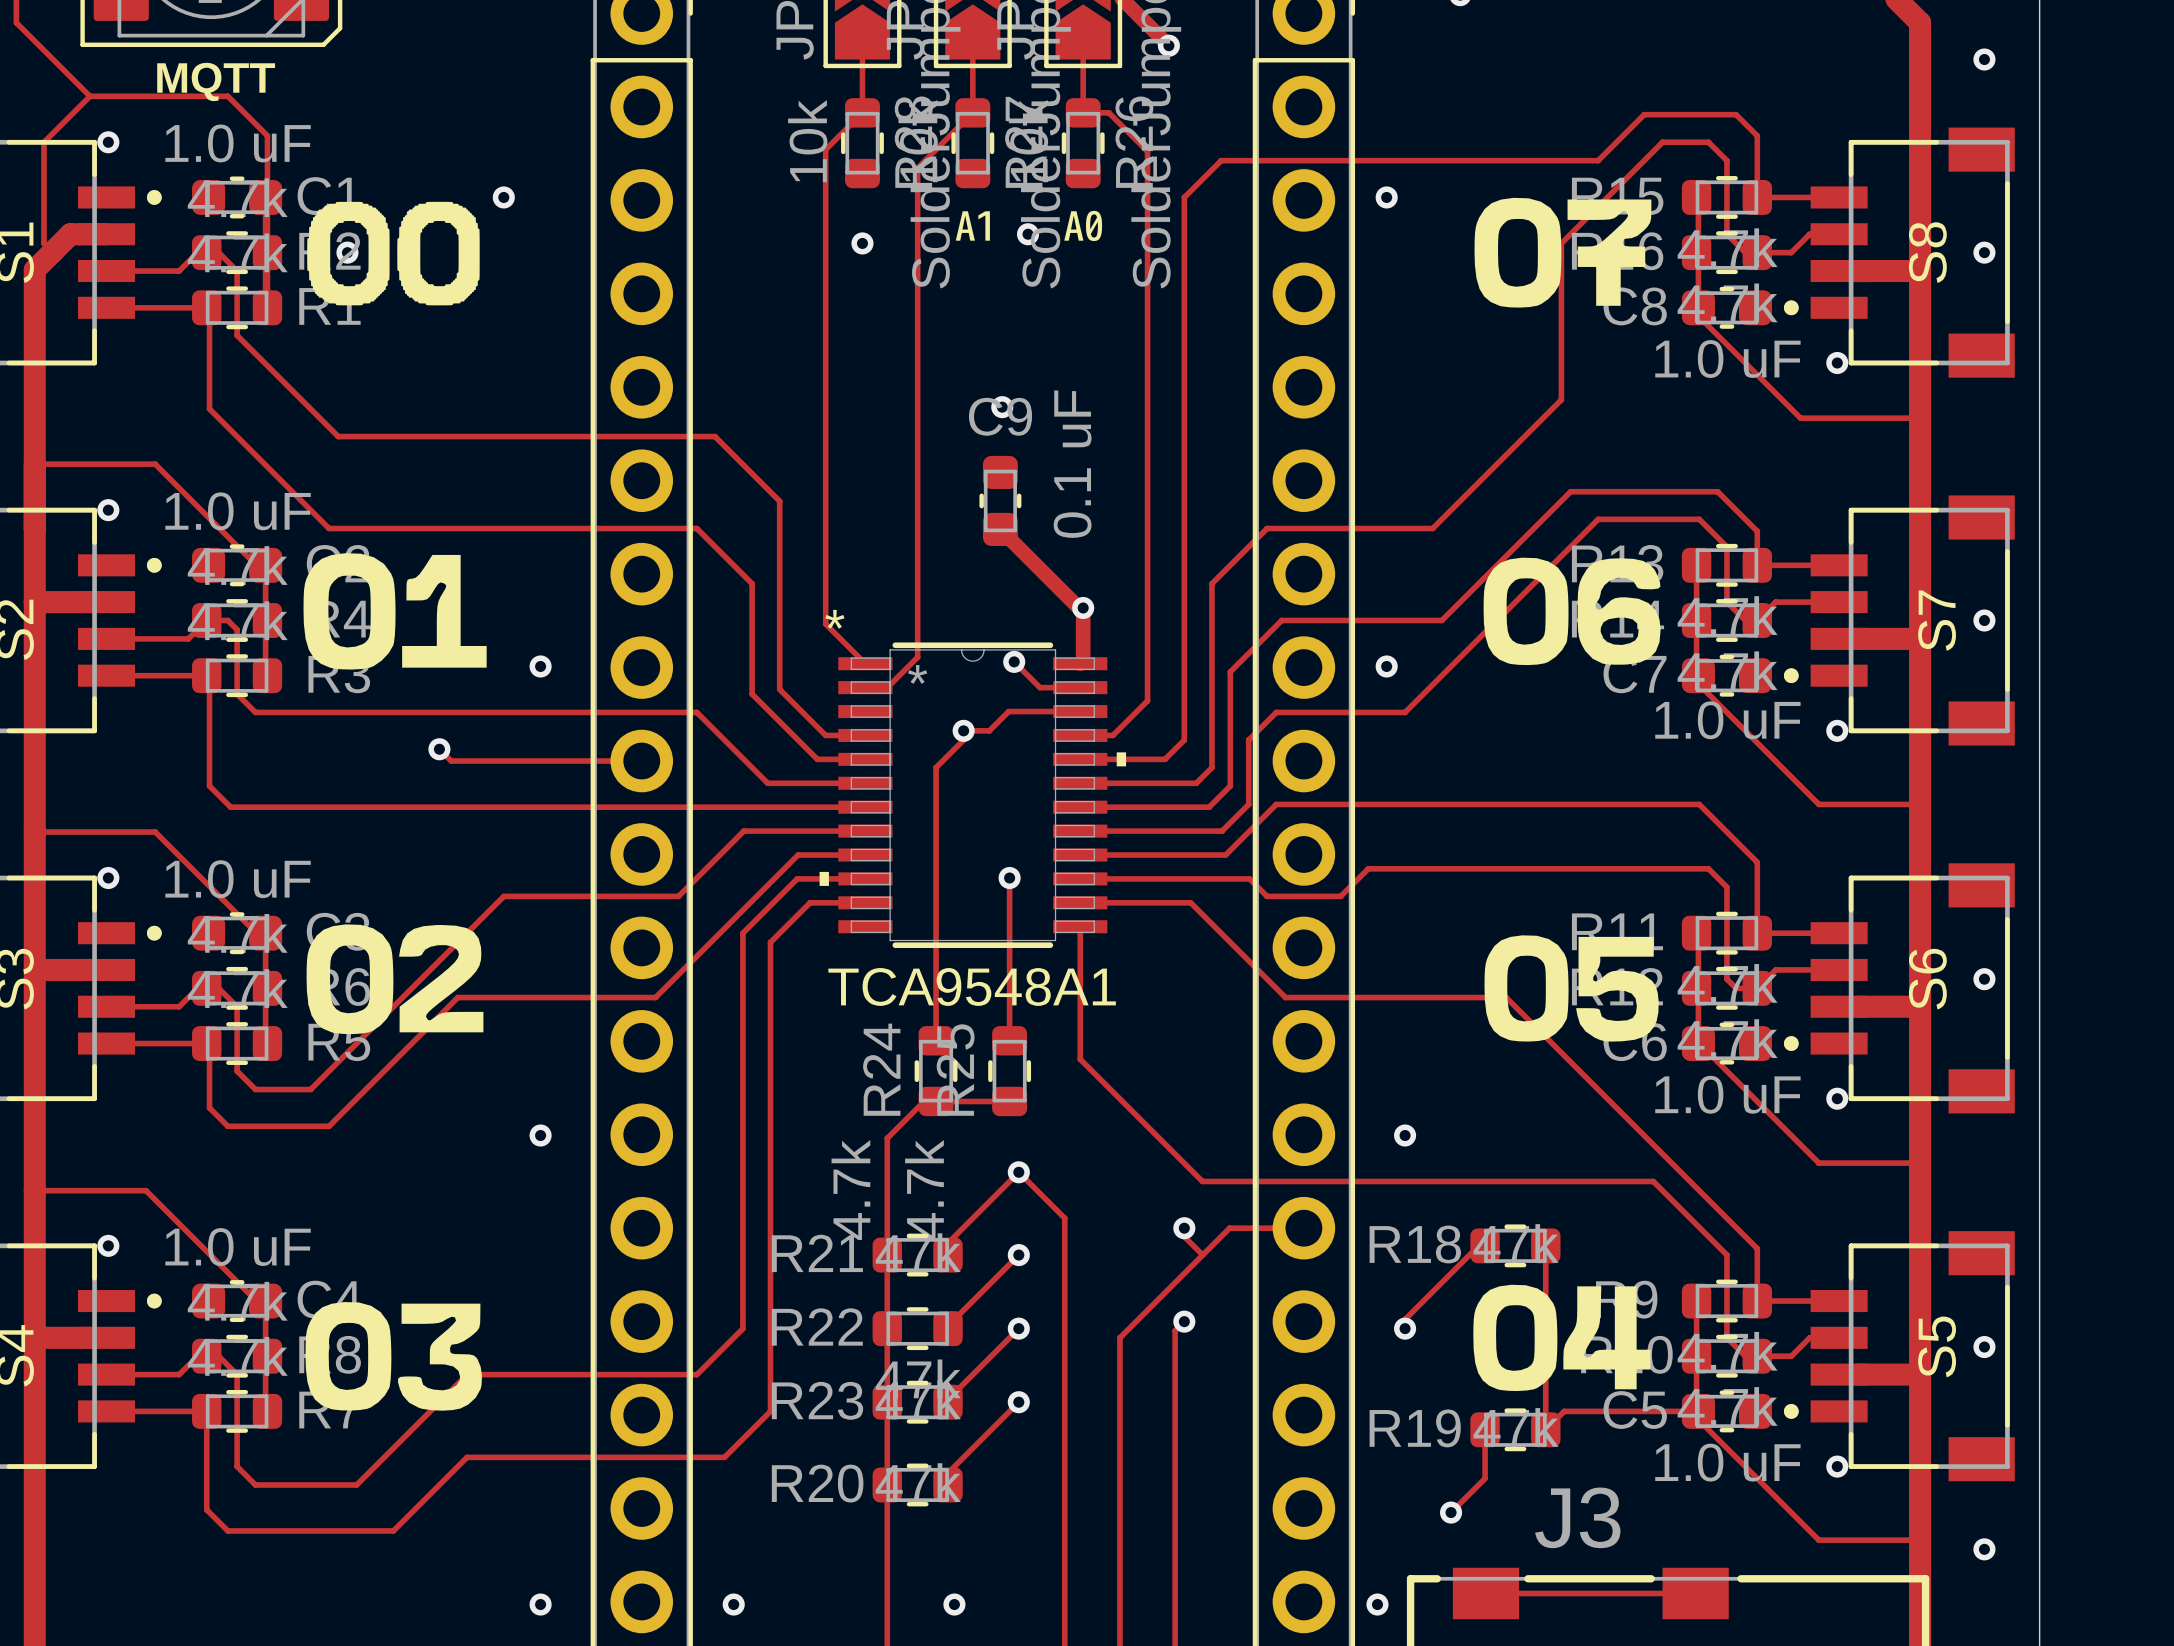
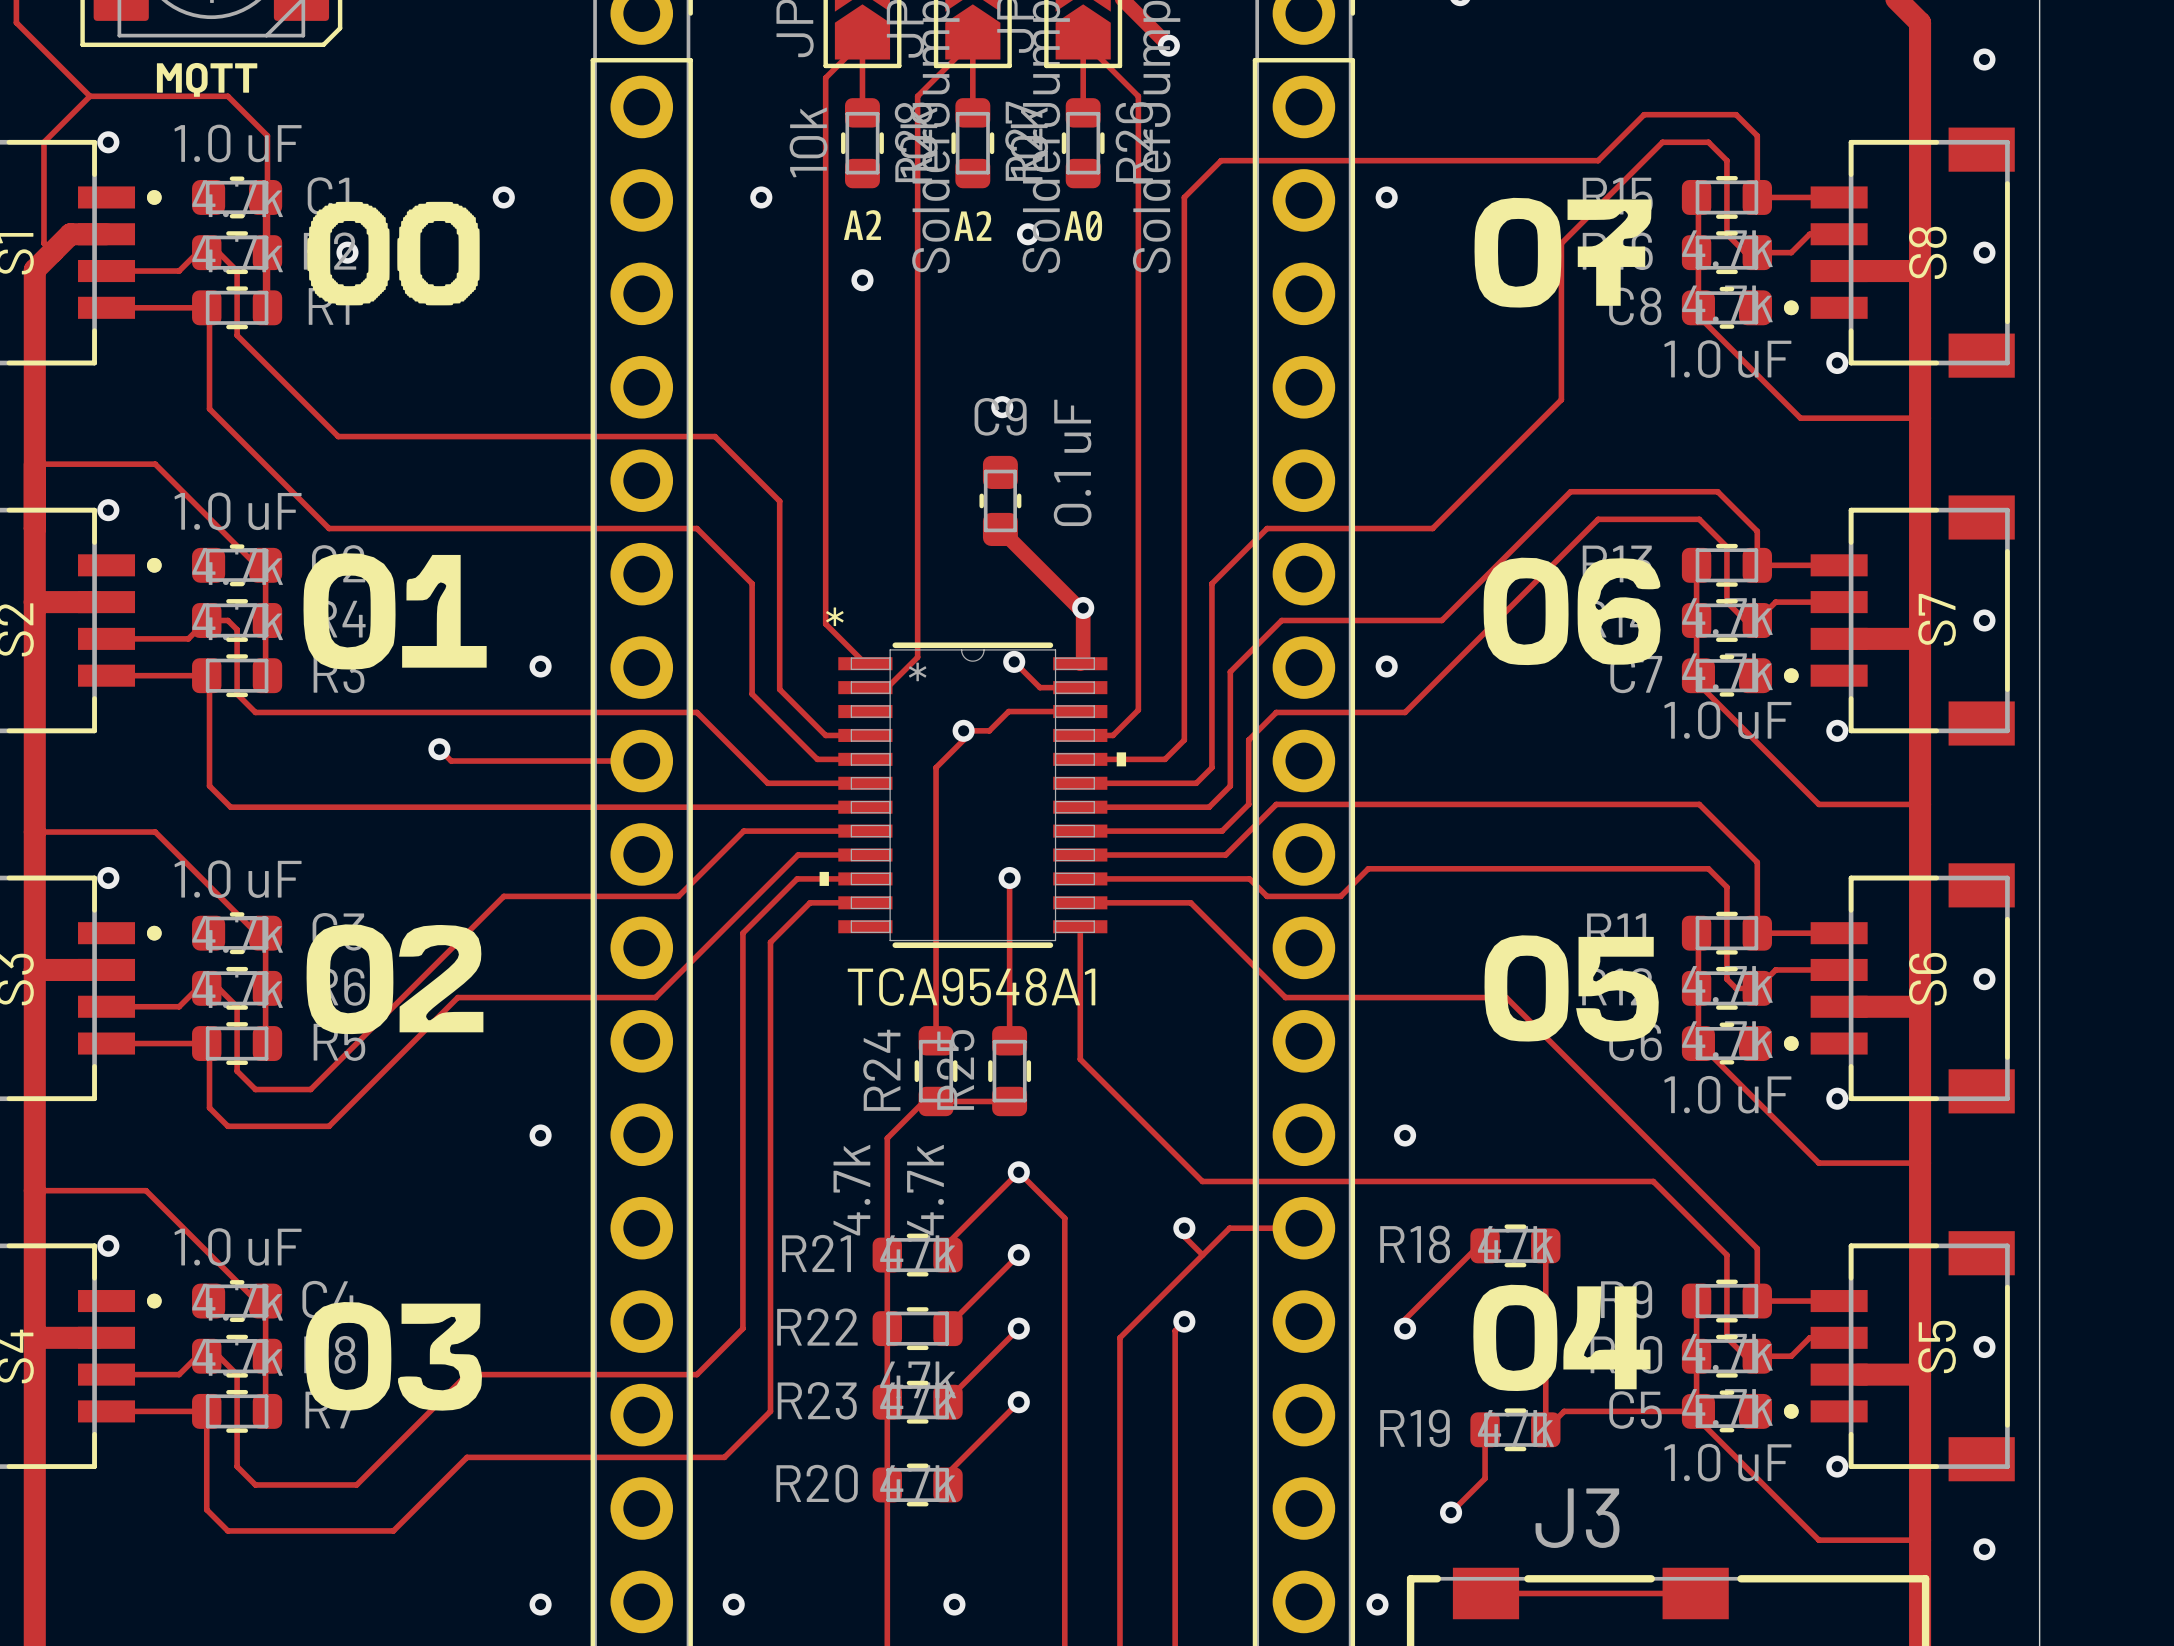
track: (862, 112) (825, 149) -> (862, 41) (825, 77) (825, 149)
track: (972, 112) (917, 168) -> (972, 41) (917, 96) (917, 168)
track: (1083, 112) (1108, 112) (1147, 151) (1147, 700) (1138, 710) -> (1083, 41) (1138, 96) (1138, 710)
via: none -> (761, 197)
drawing: none -> [843, 210, 881, 240]
drawing shape: [955, 211, 990, 241] -> [954, 211, 992, 241]
via position: (862, 243) -> (862, 280)

